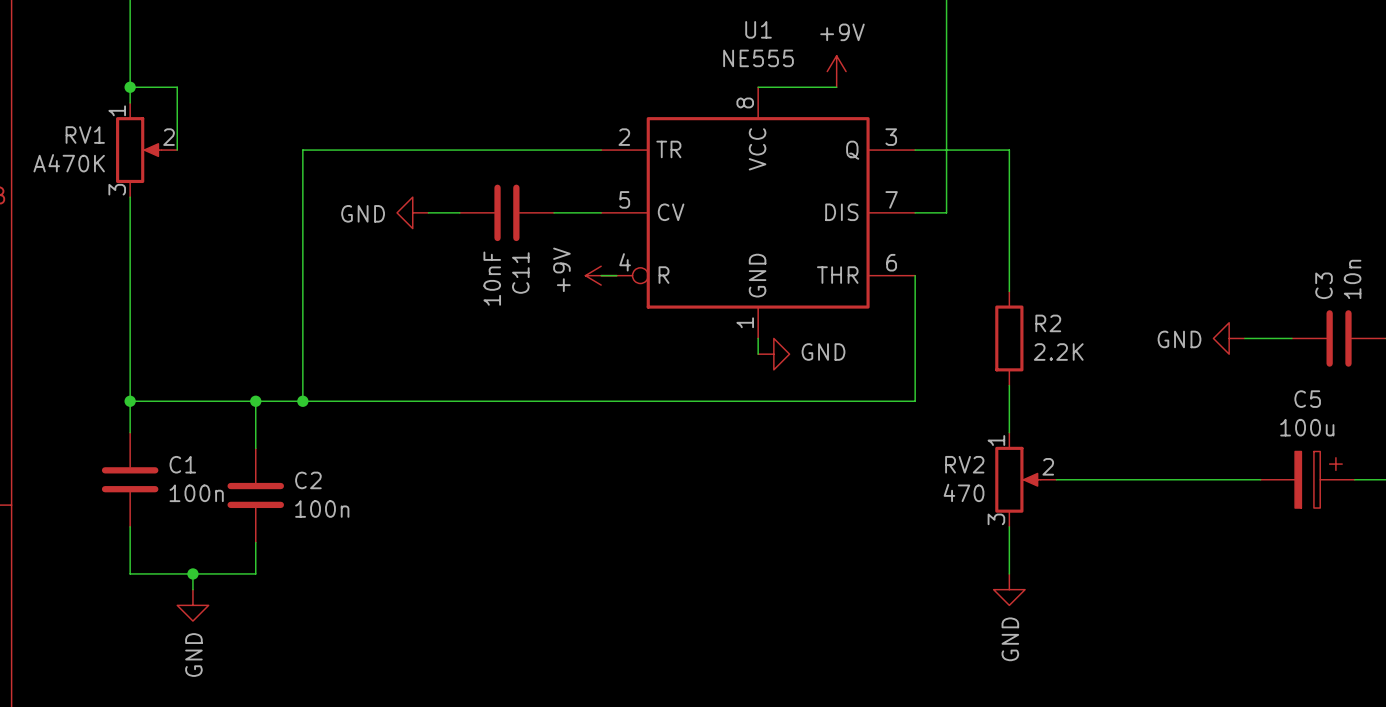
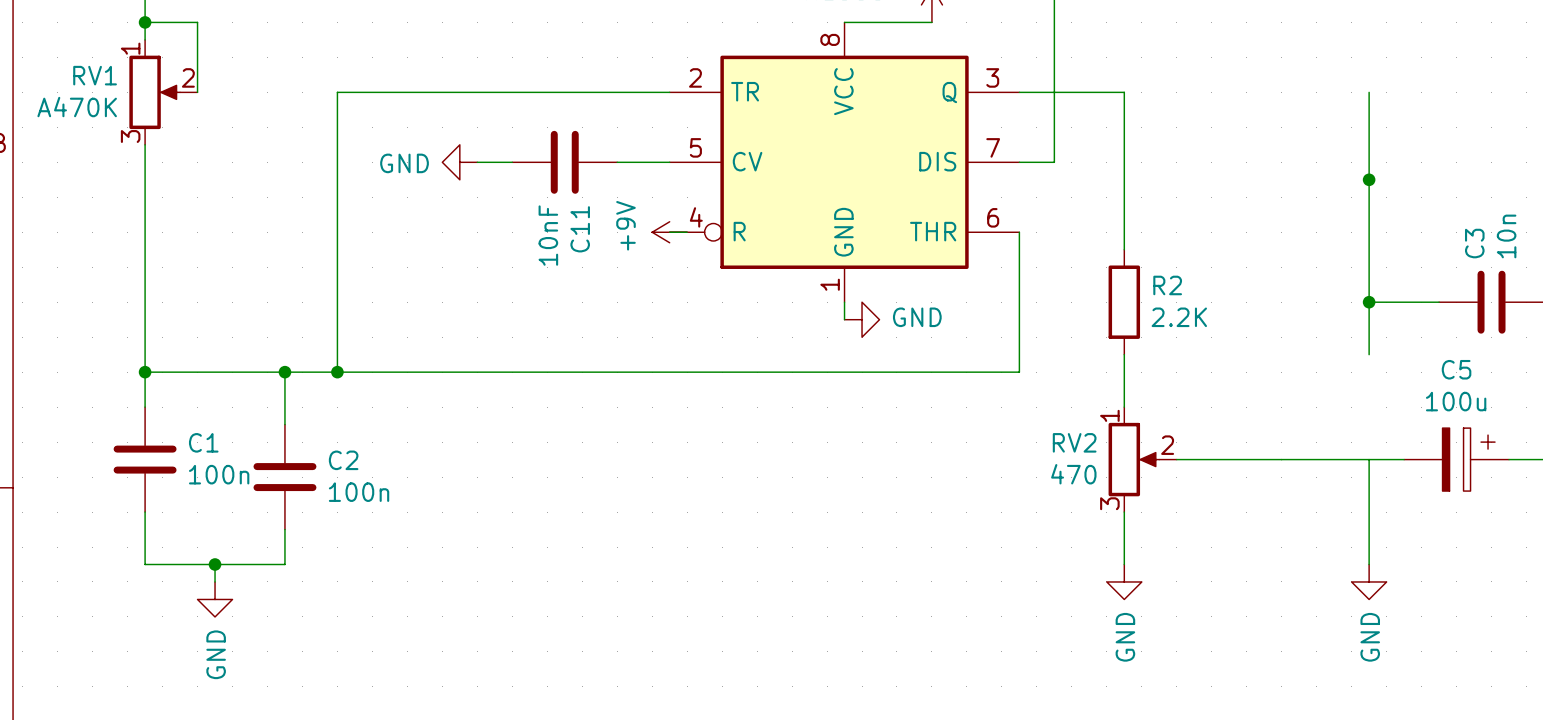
wire: none -> (1369, 92) (1369, 354)
junction: none -> (1369, 179)
junction: none -> (1369, 302)
power symbol: GND (1229, 338) -> none
wire: none -> (1369, 459) (1369, 564)
power symbol: none -> GND (1369, 581)

